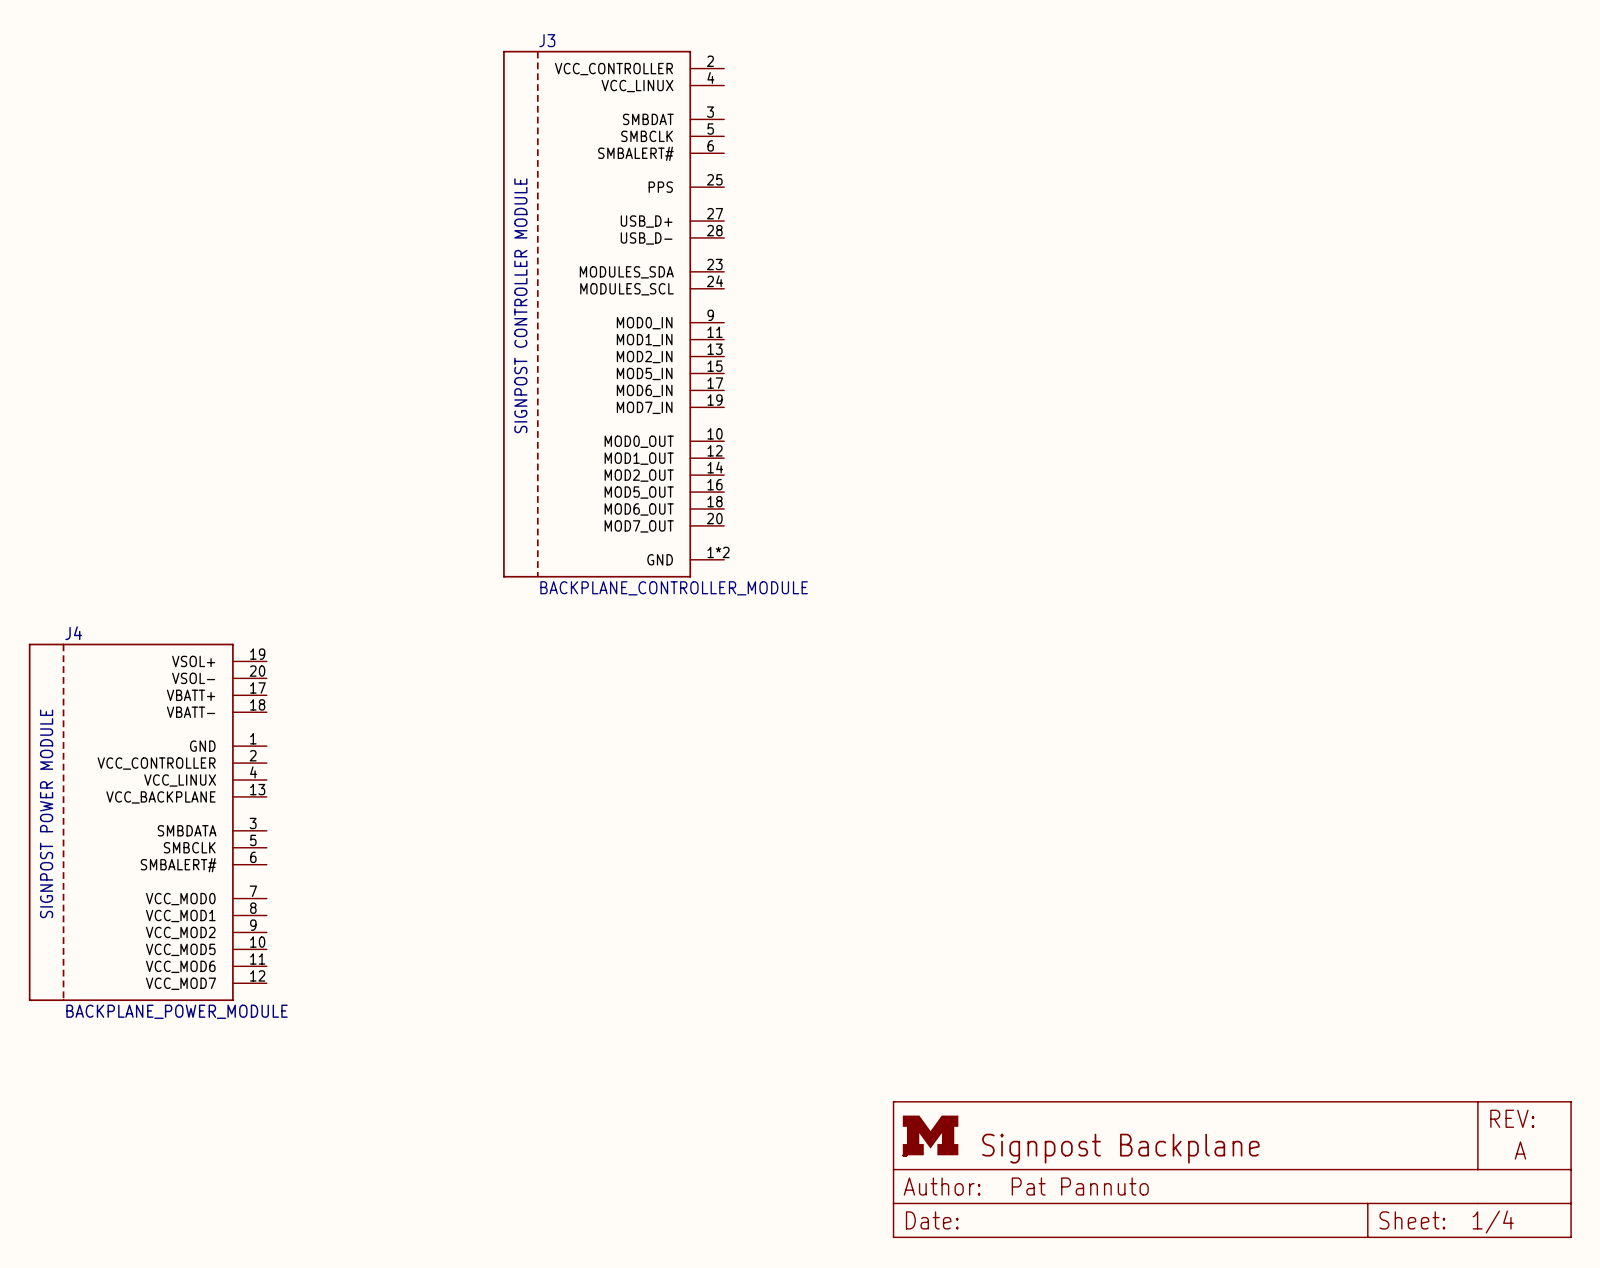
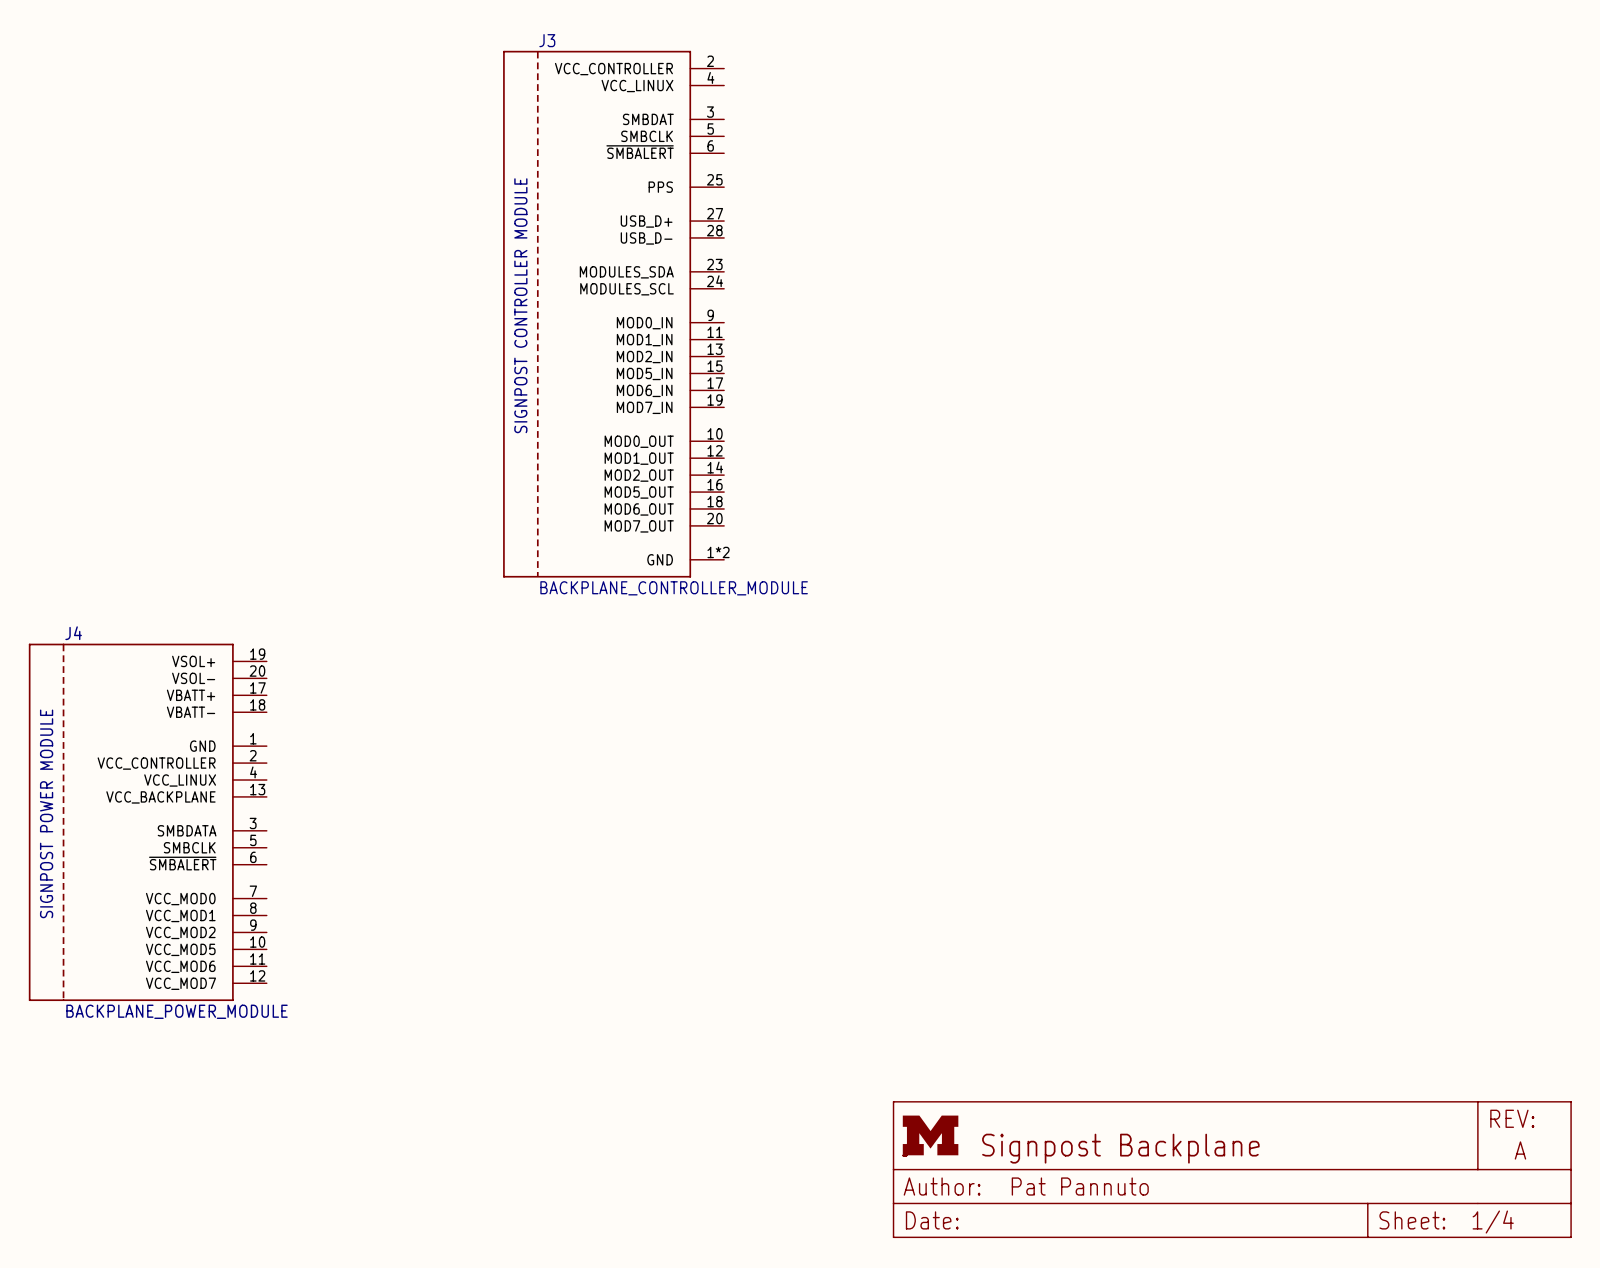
J3 pin name: SMBALERT# (635, 153) -> ~{SMBALERT} (640, 152)
J4 pin name: SMBALERT# (178, 865) -> ~{SMBALERT} (182, 863)

